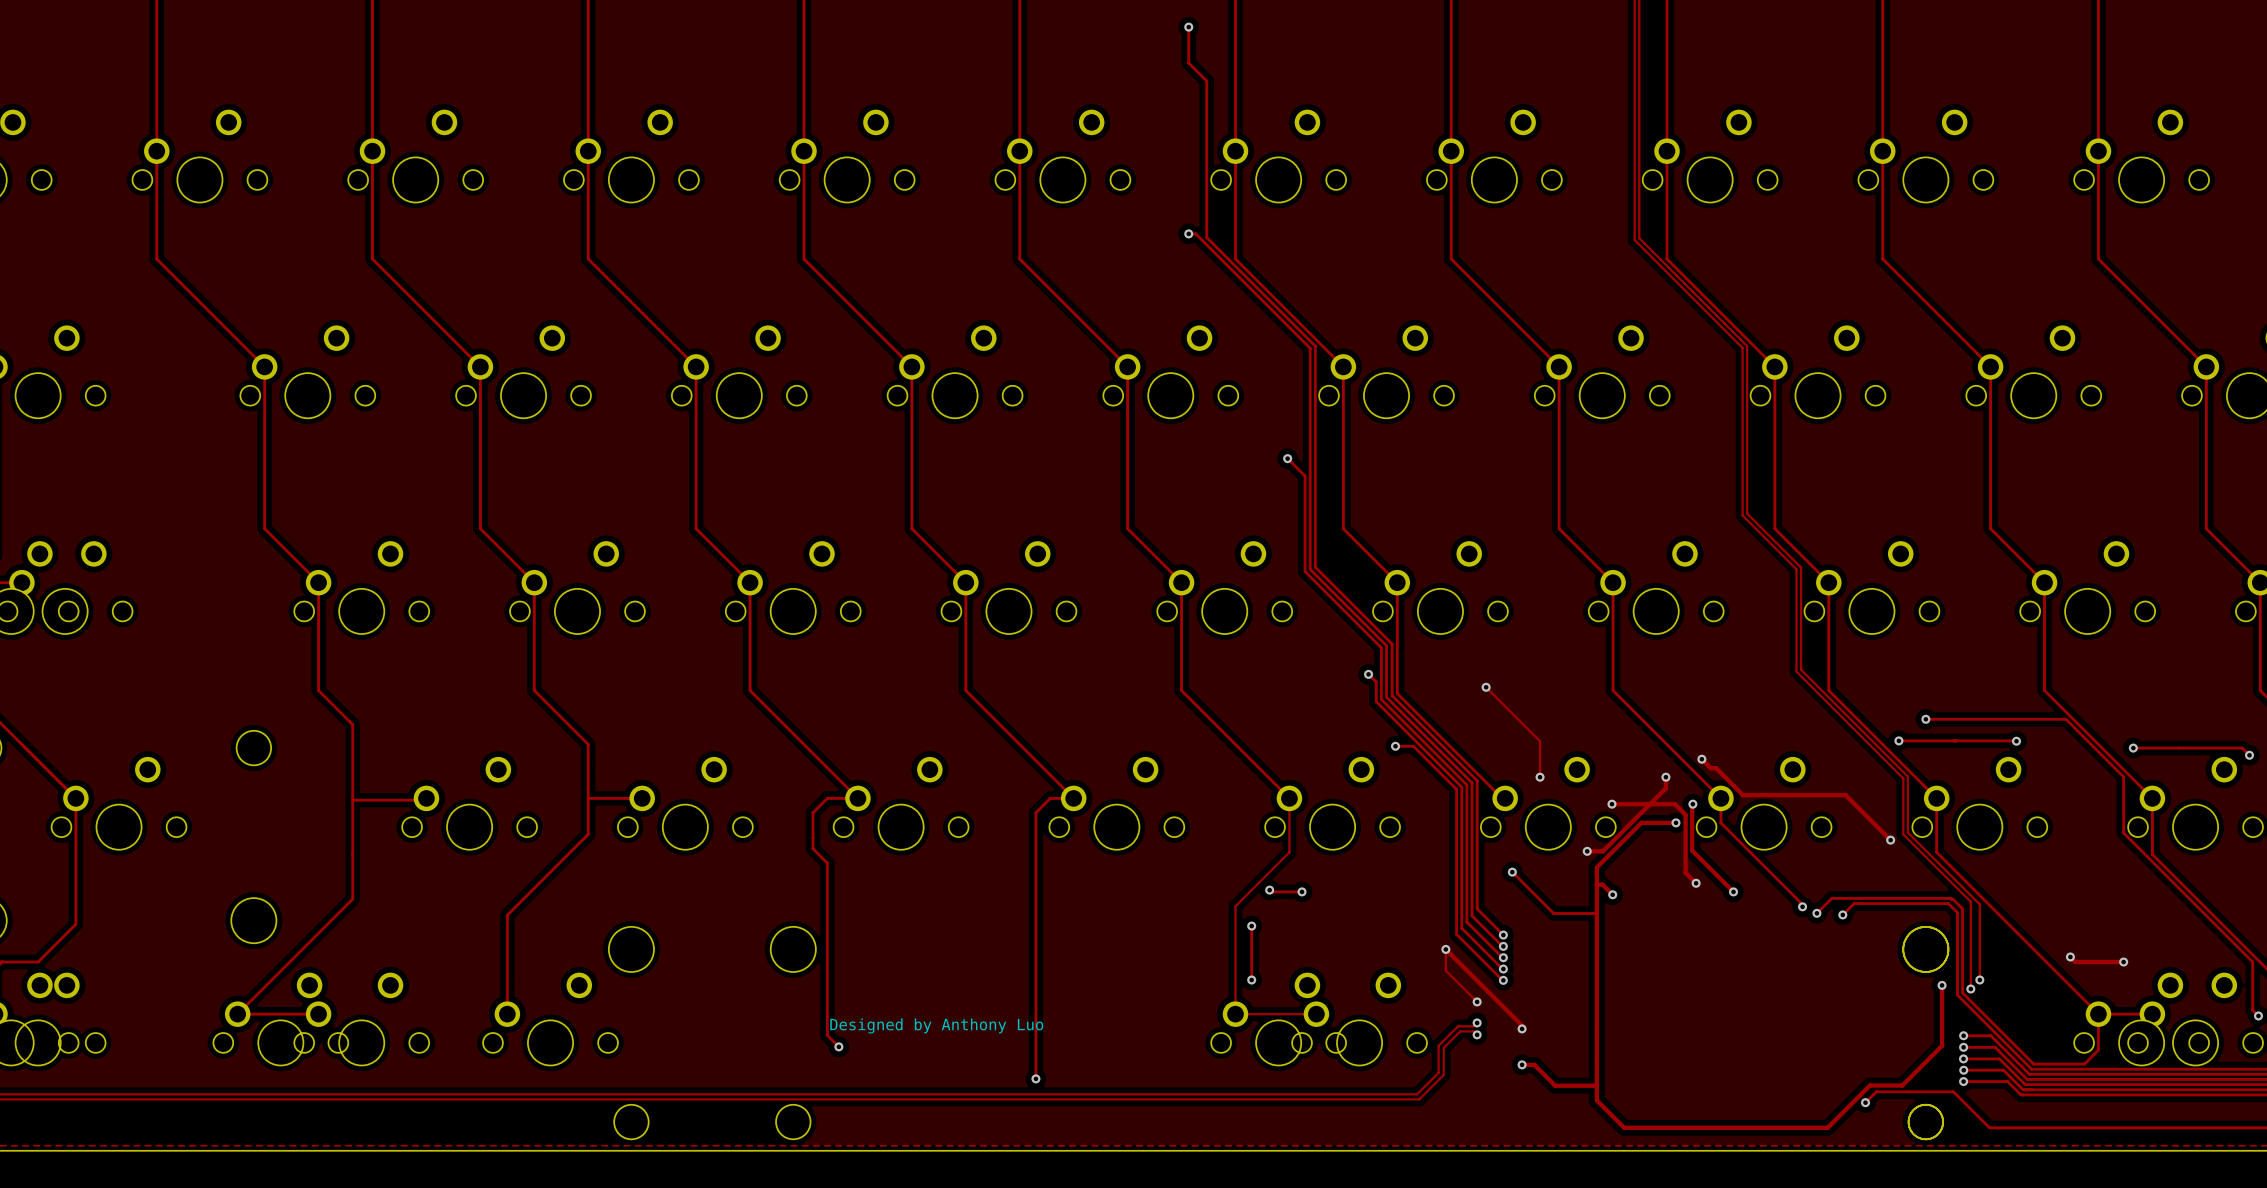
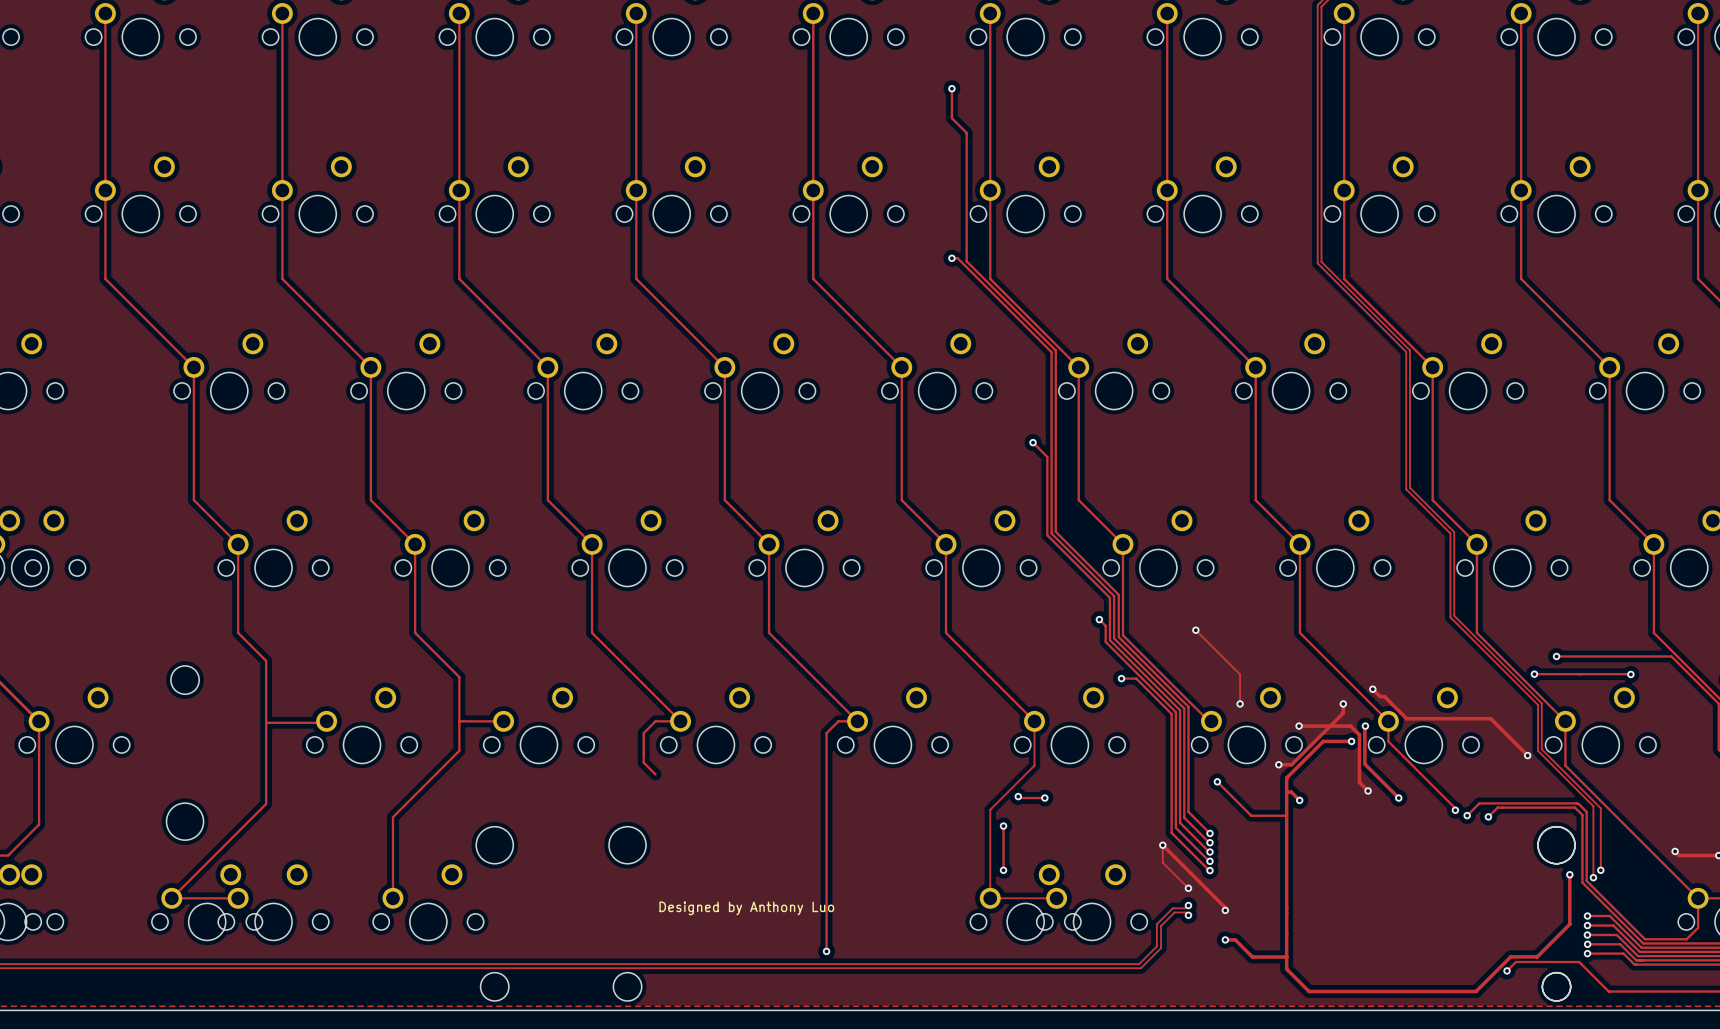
track: (827, 863) (827, 1035) (838, 1046) -> none
via: (838, 1046) -> none

